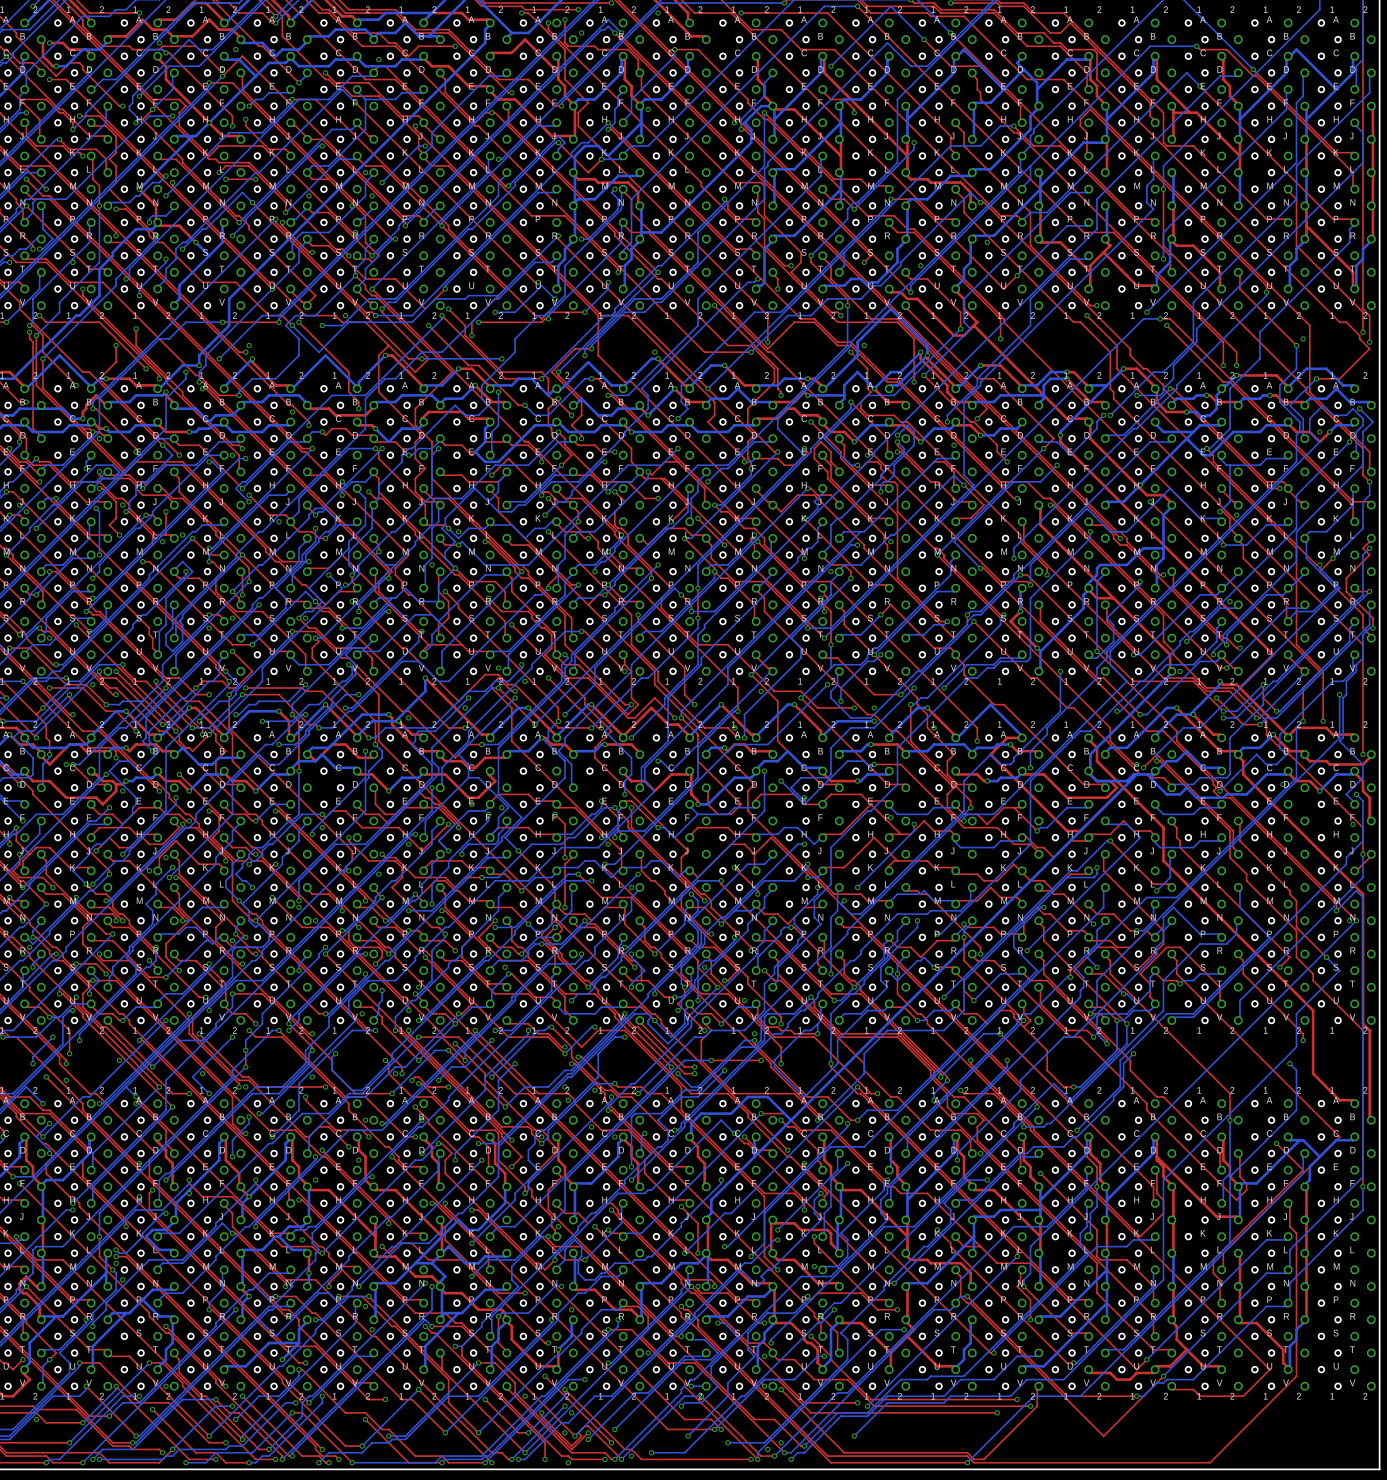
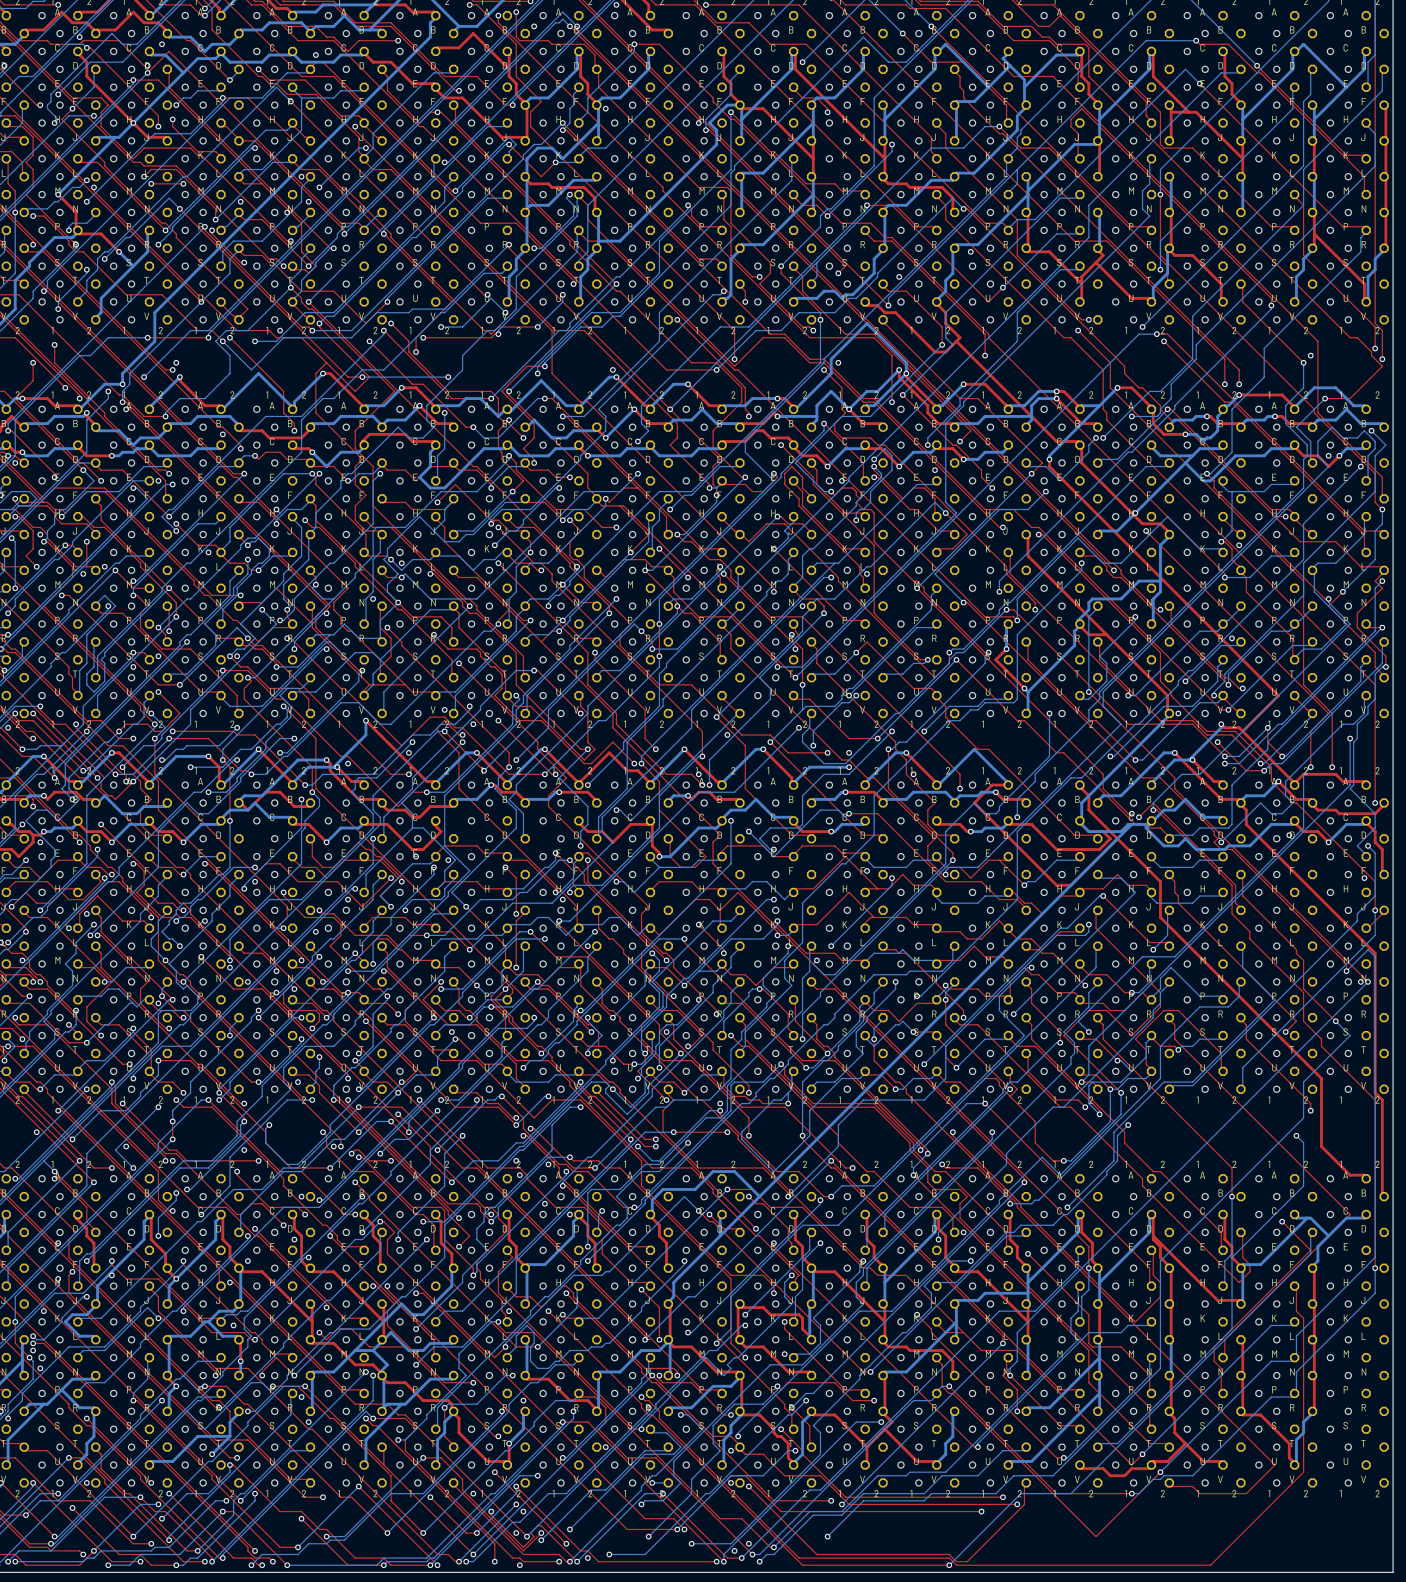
top track: none -> (1274, 516) (1300, 541) (1335, 541) (1360, 566) (1382, 566)

